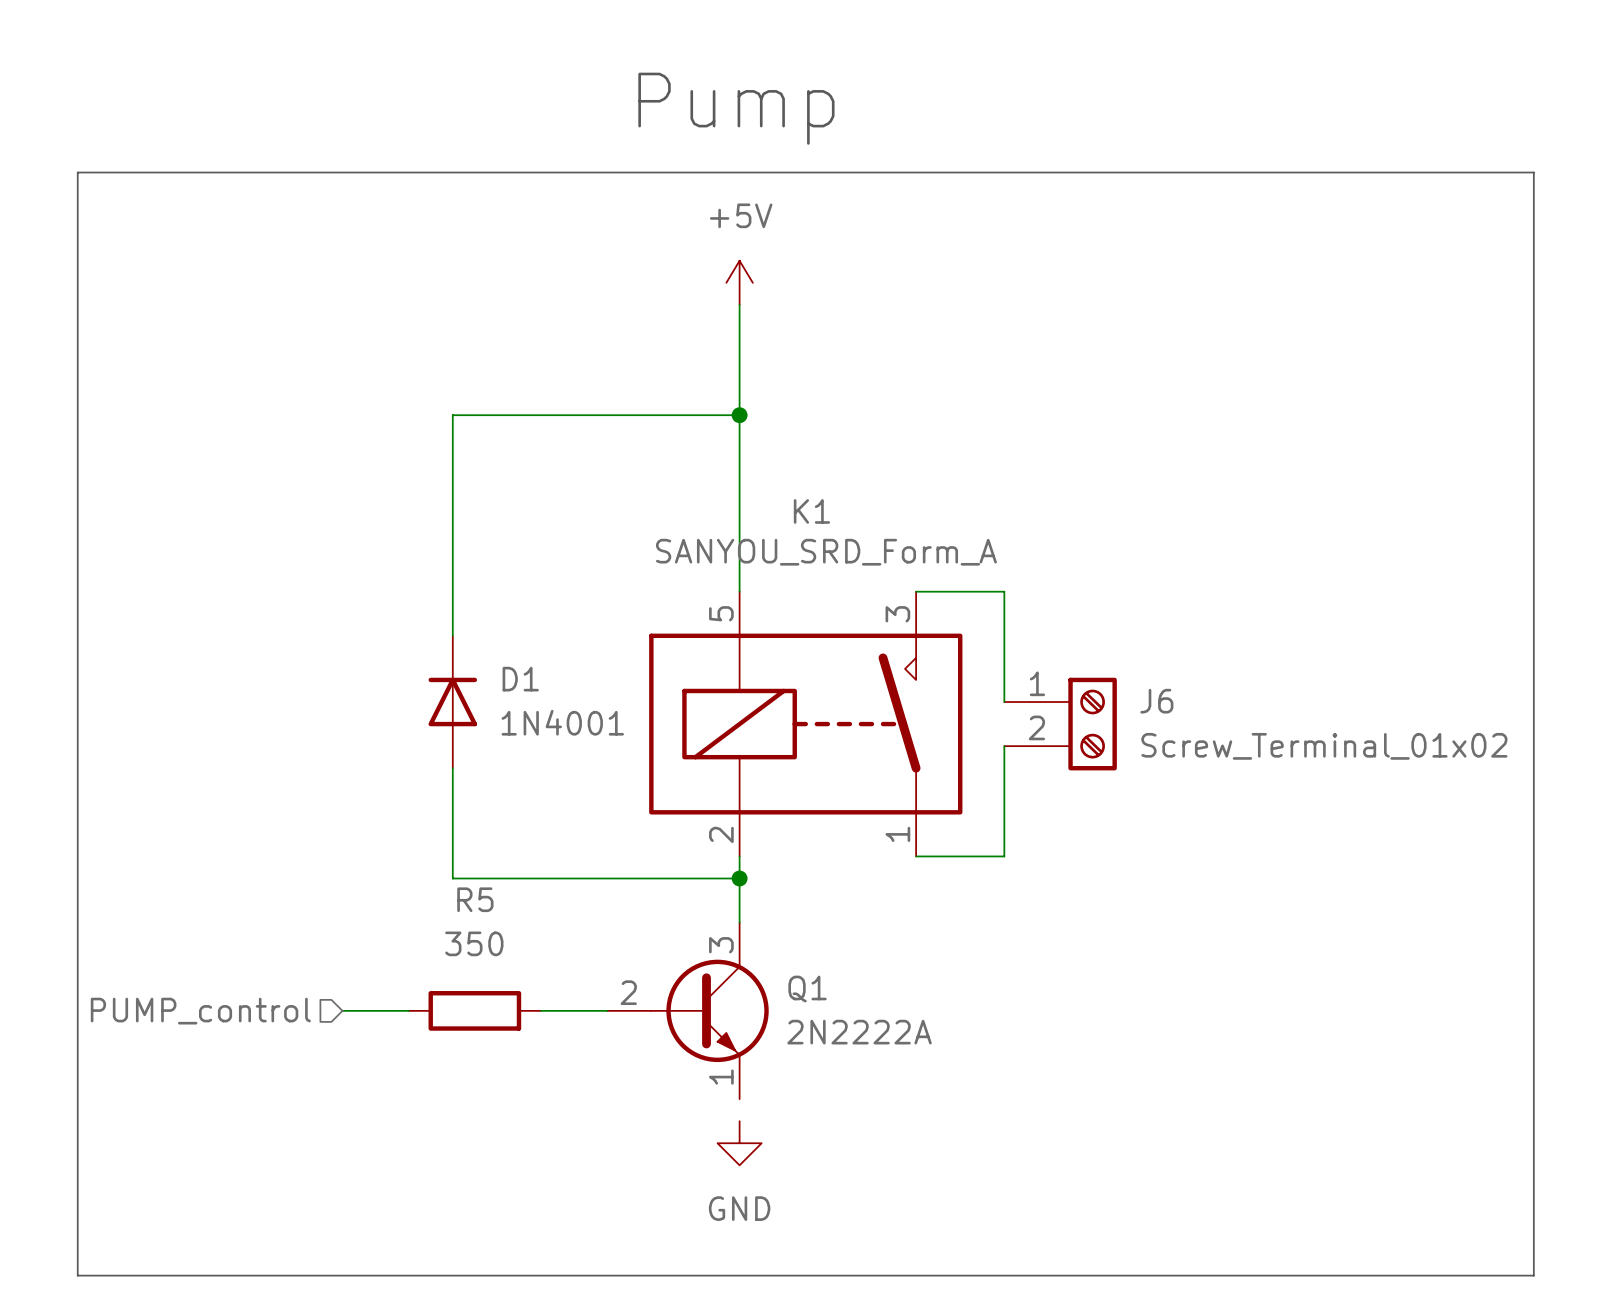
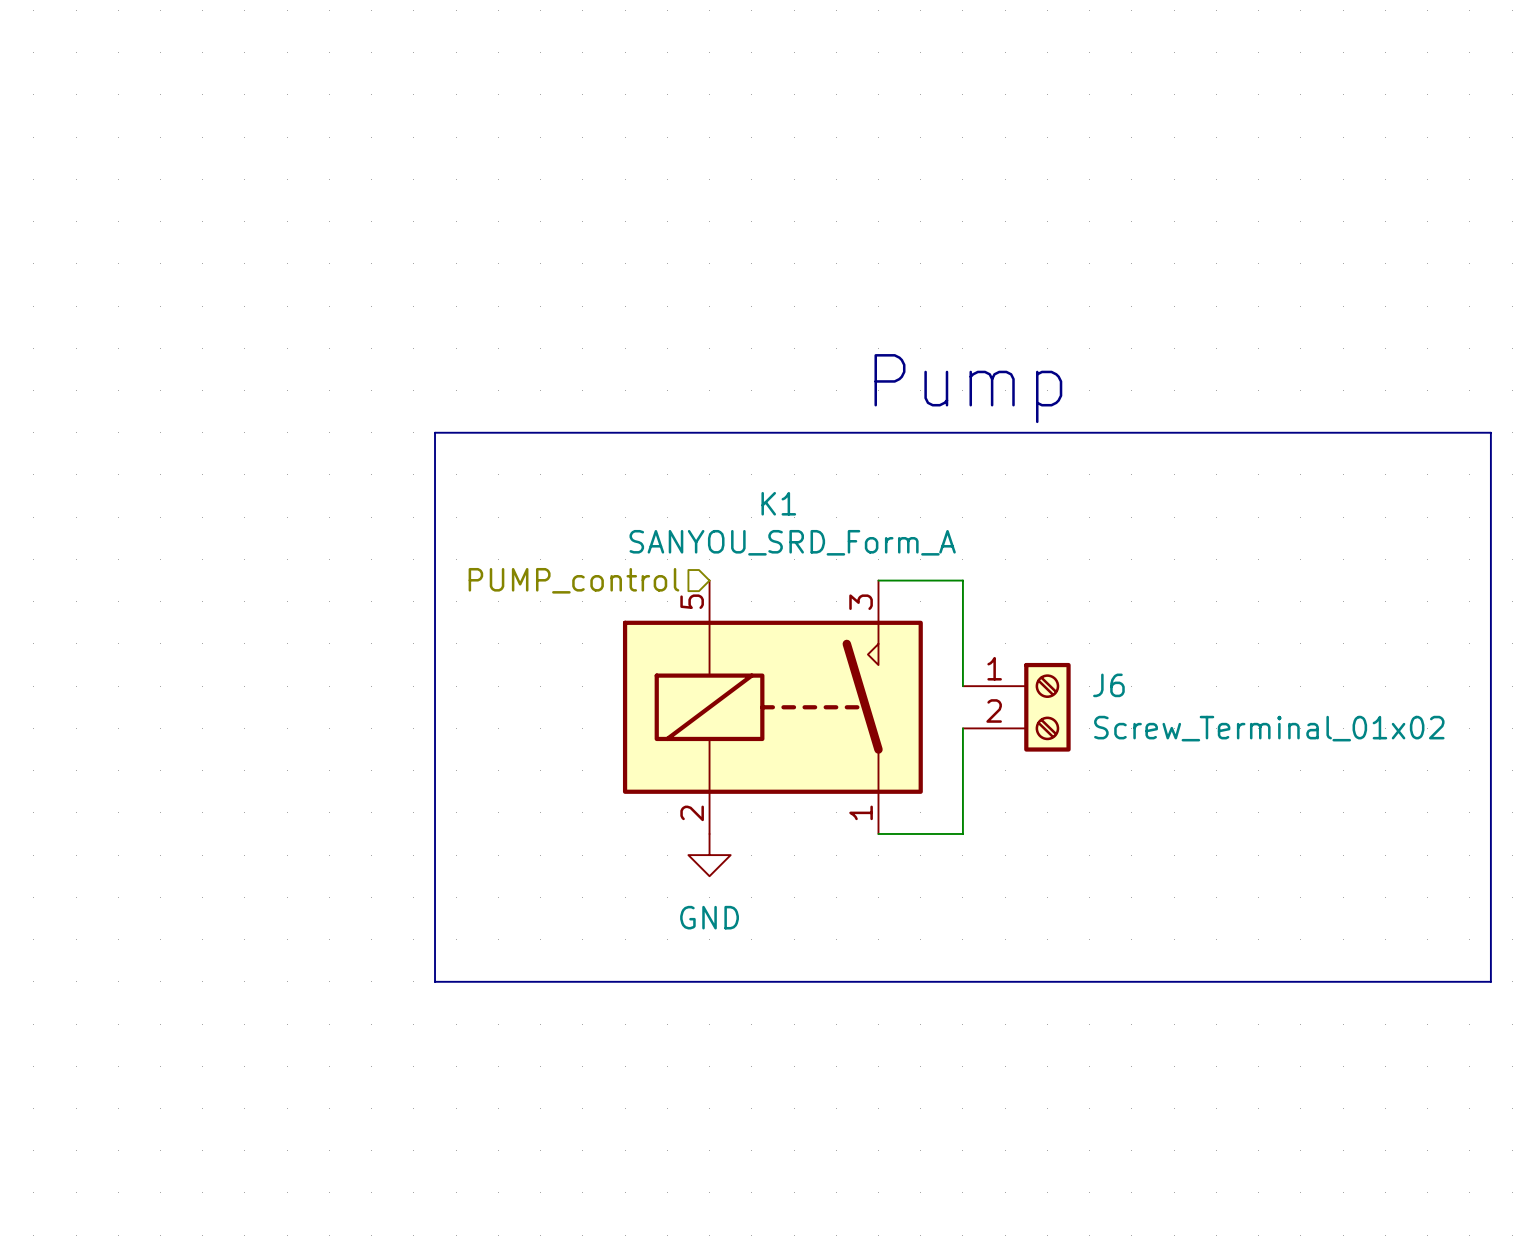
text position: Pump (736, 108) -> Pump (968, 388)
line: (77, 172) (1533, 172) (1533, 1275) (77, 1275) (77, 172) -> none
power symbol: +5V (739, 282) -> none
wire: (739, 304) (739, 591) -> none
wire: (739, 415) (452, 415) (452, 635) -> none
junction: (739, 415) -> none
line: none -> (435, 432) (1490, 432) (1490, 981) (435, 981) (435, 432)
hierarchical label: none -> PUMP_control (573, 580)
D1: 1N4001 (452, 702) -> none
wire: (452, 768) (452, 878) (739, 878) -> none
wire: (739, 856) (739, 922) -> none
junction: (739, 878) -> none
wire: (342, 1010) (408, 1010) -> none
R5: 350 (474, 1010) -> none
Q1: 2N2222A (687, 1010) -> none
hierarchical label: PUMP_control (200, 1011) -> none
power symbol position: GND (739, 1143) -> GND (709, 855)

